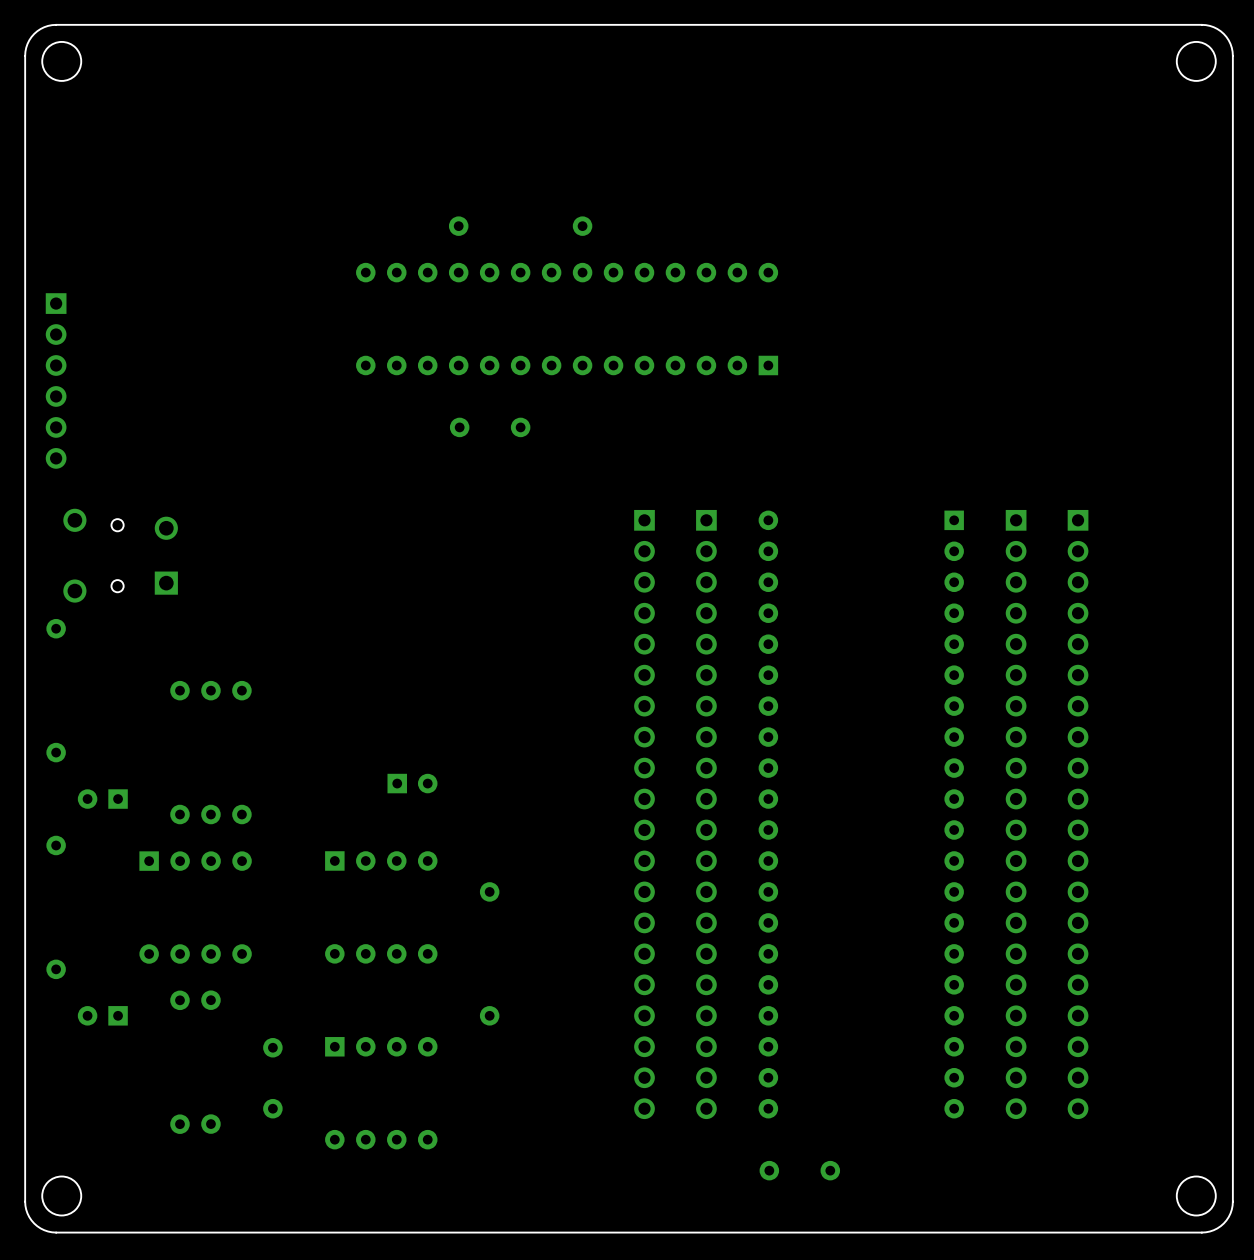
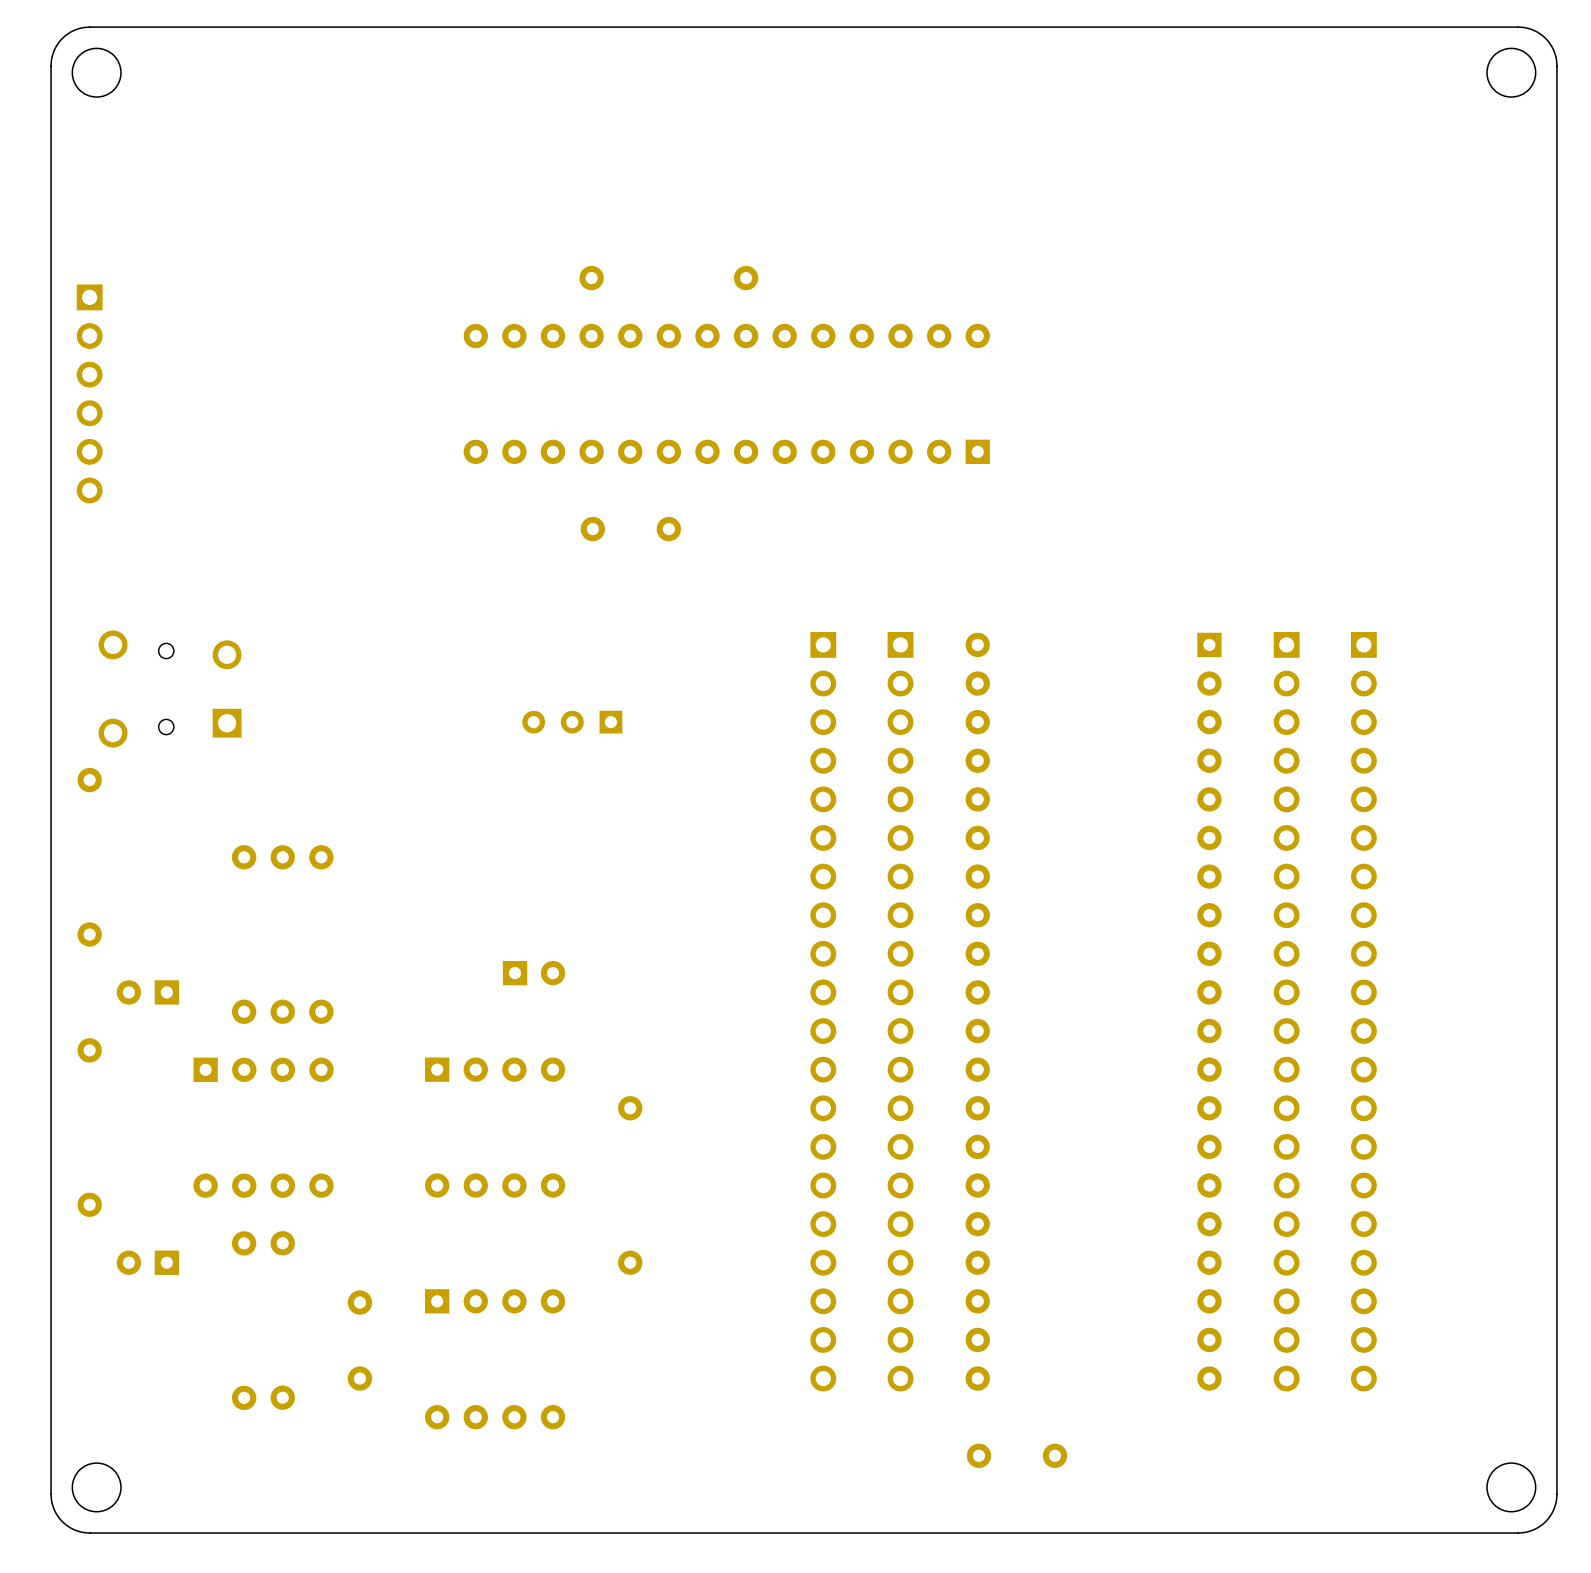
part position: (56, 380) -> (89, 393)
part: none -> (572, 722)

